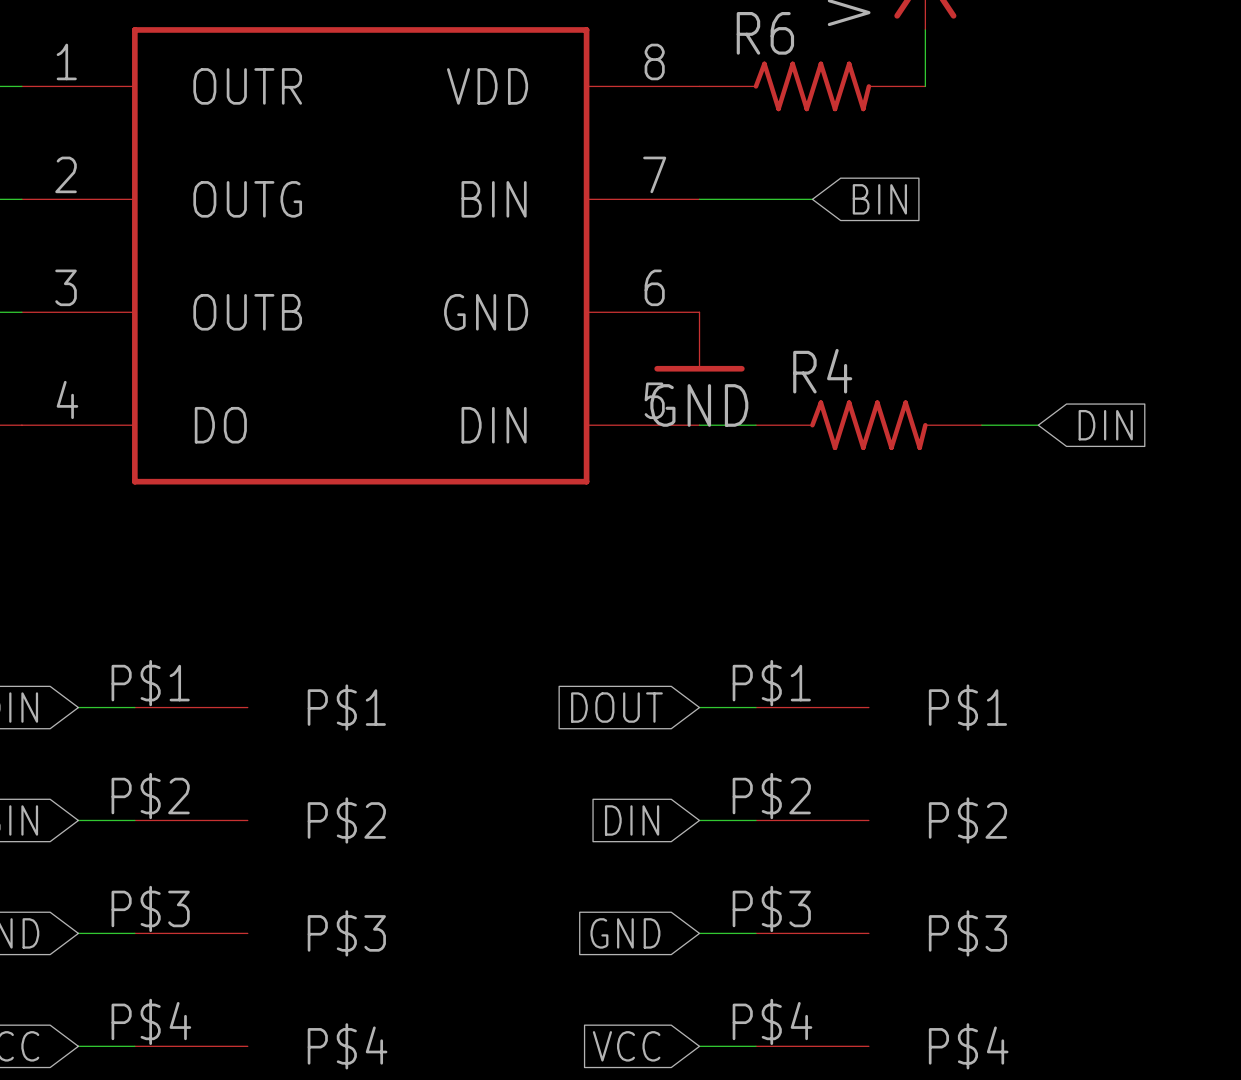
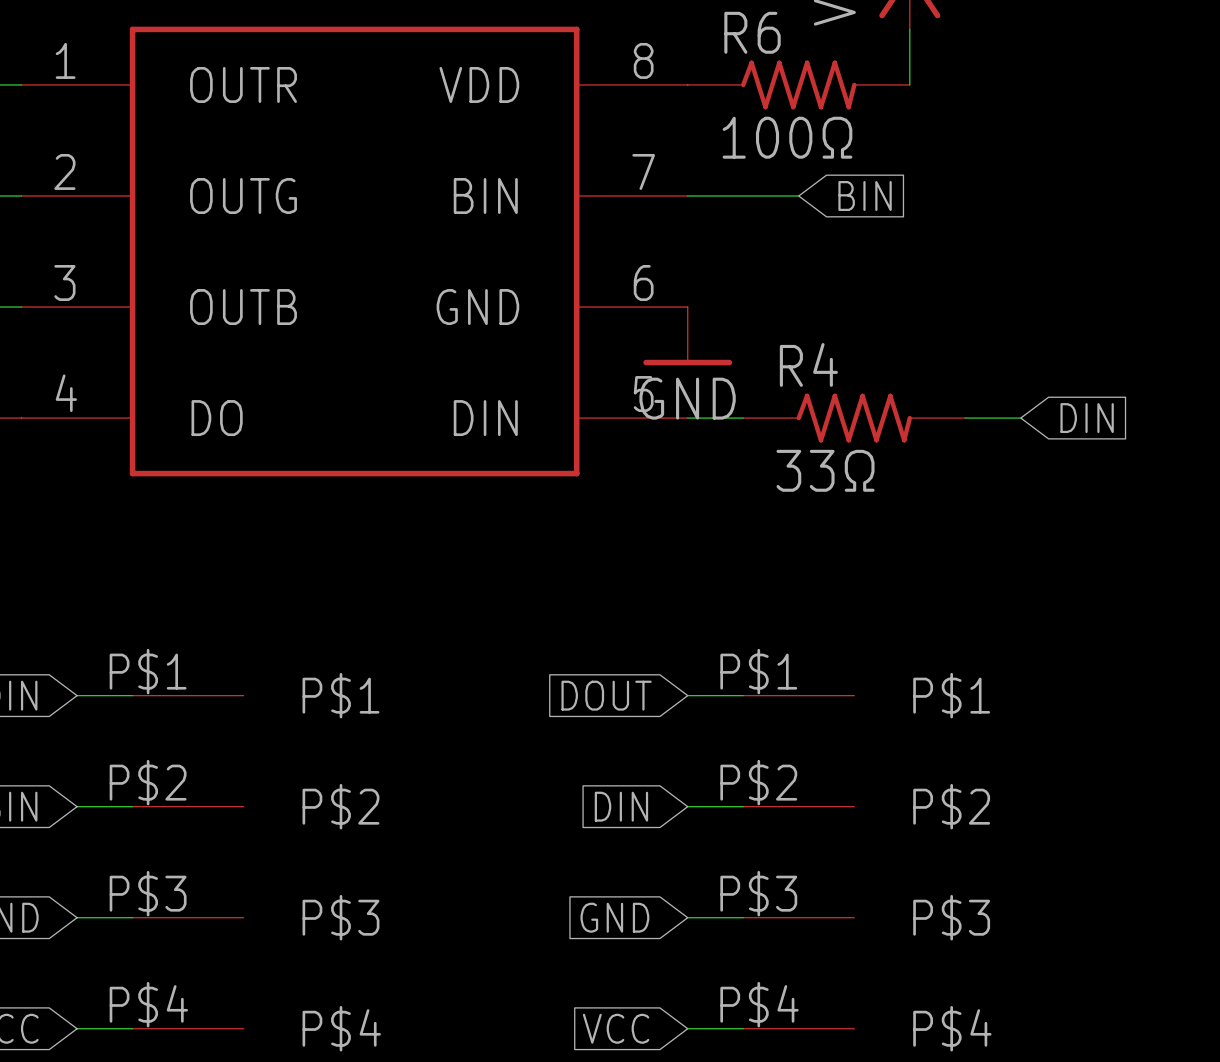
R6 value: none -> 100Ω (787, 137)
R4 value: none -> 33Ω (825, 470)

